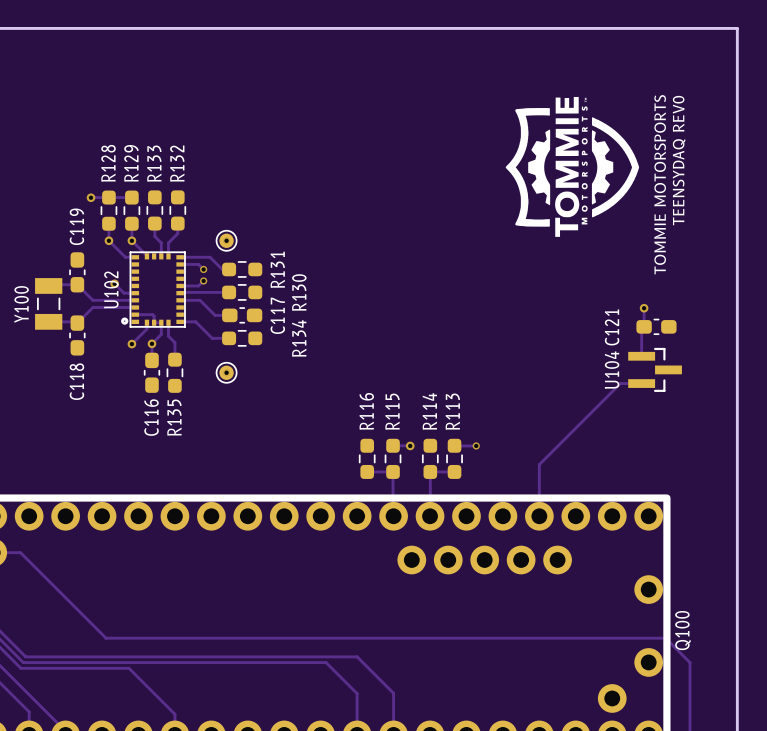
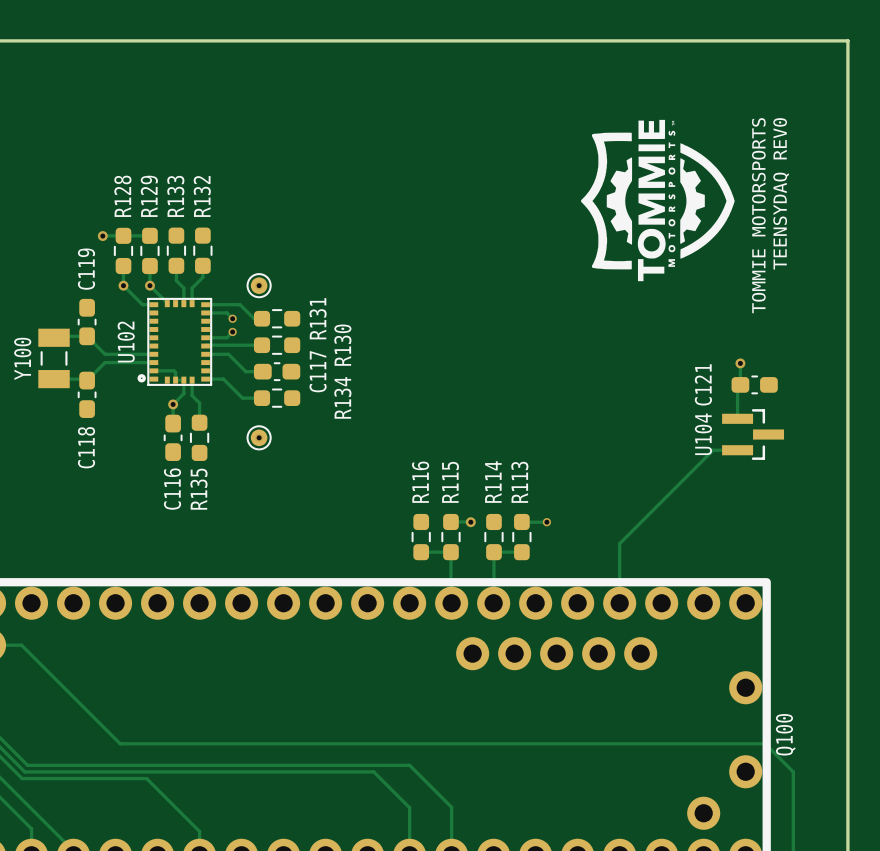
track: (114, 283) (124, 293) (135, 293) -> none
via: (114, 283) -> none
track: (146, 322) (146, 329) (131, 344) -> none
via: (131, 344) -> none

